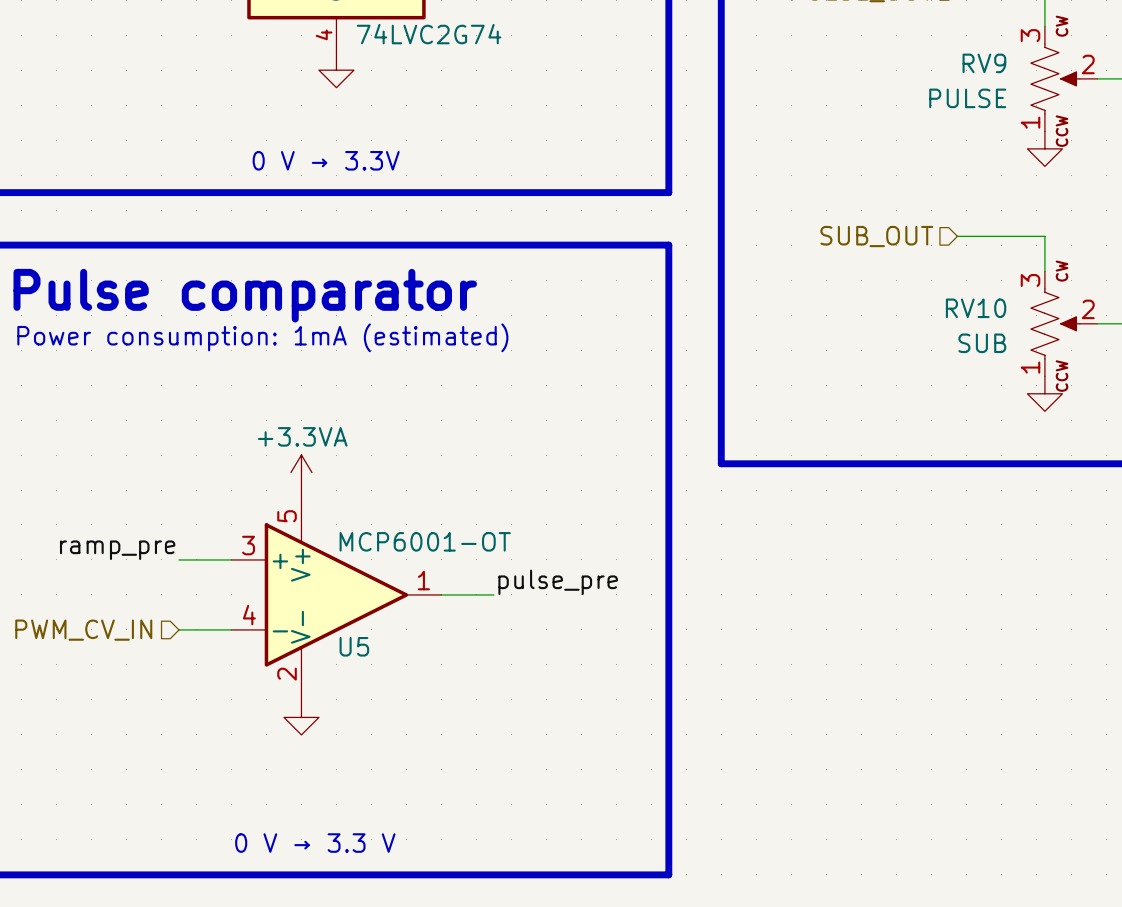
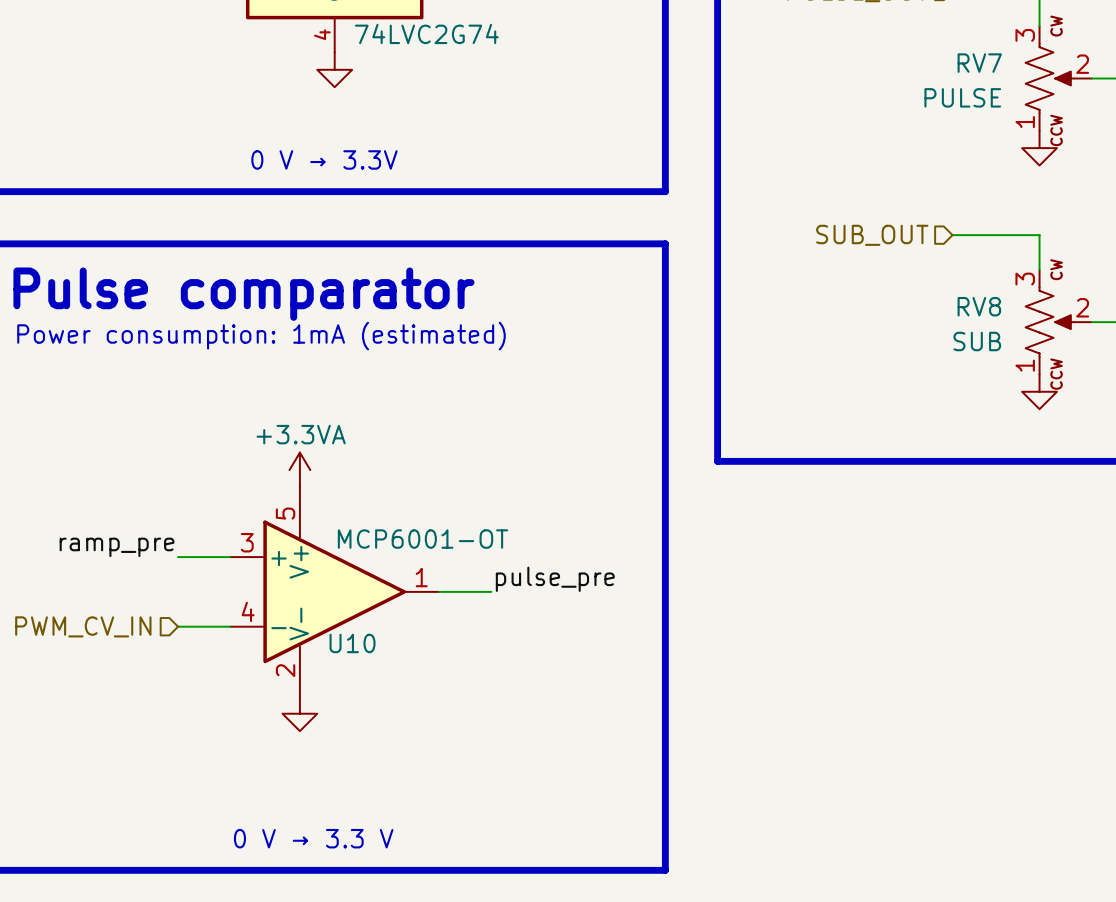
RV9 name: RV9 (984, 63) -> RV7 (979, 63)
RV10 name: RV10 (976, 308) -> RV8 (979, 306)
U5 name: U5 (354, 646) -> U10 (352, 643)

